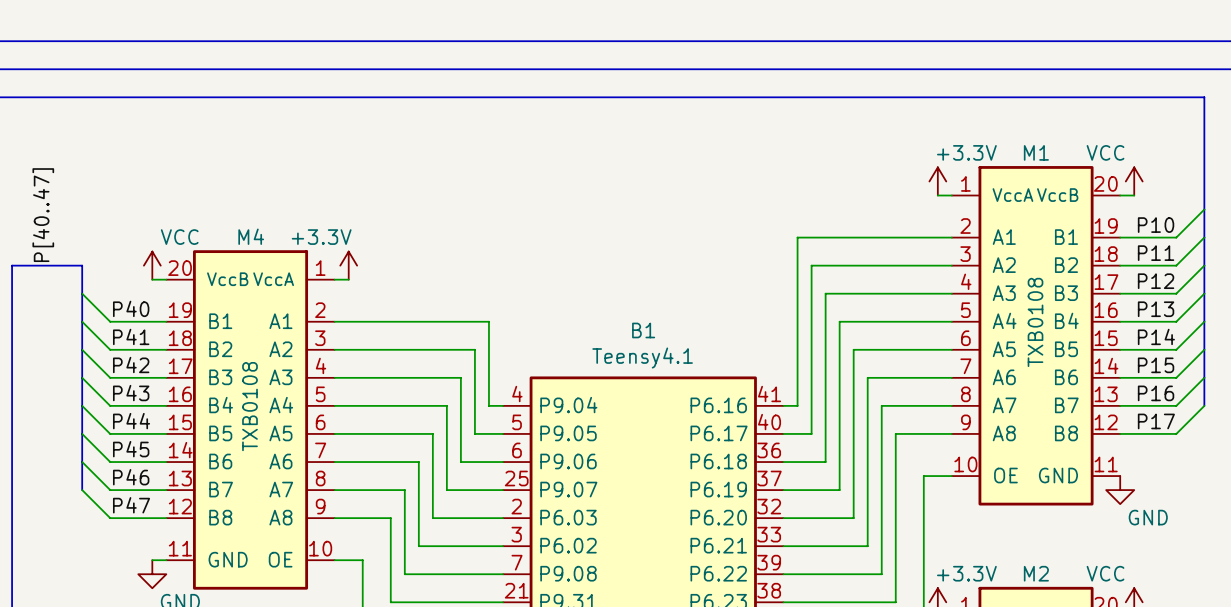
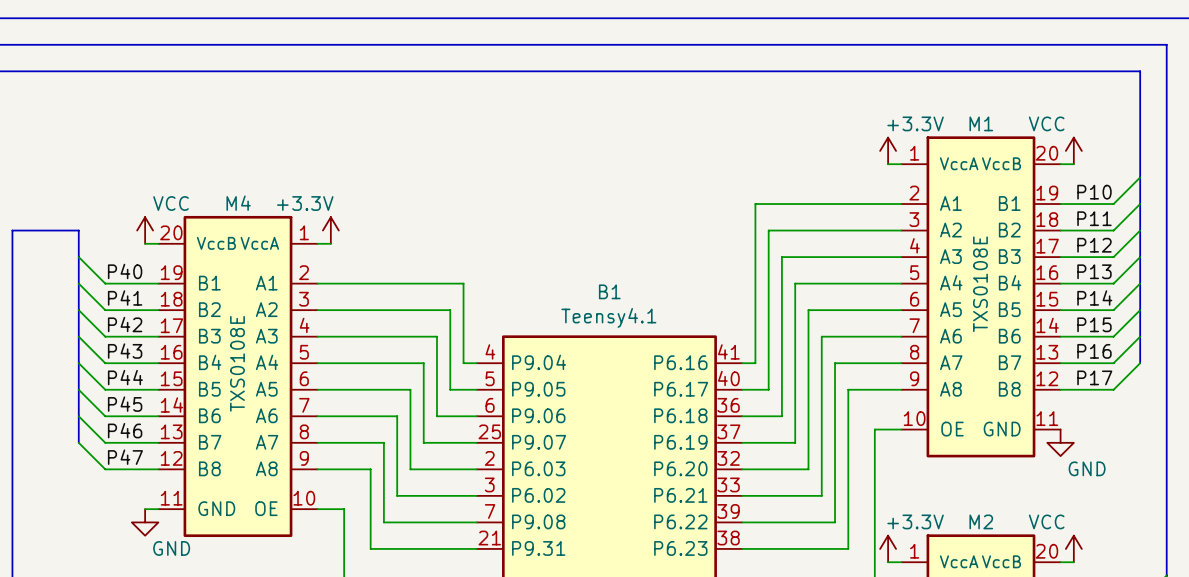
label: P[40..47] (43, 215) -> none
M1 value: TXB0108 (1035, 322) -> TXS0108E (980, 284)
M4 value: TXB0108 (249, 406) -> TXS0108E (237, 363)

